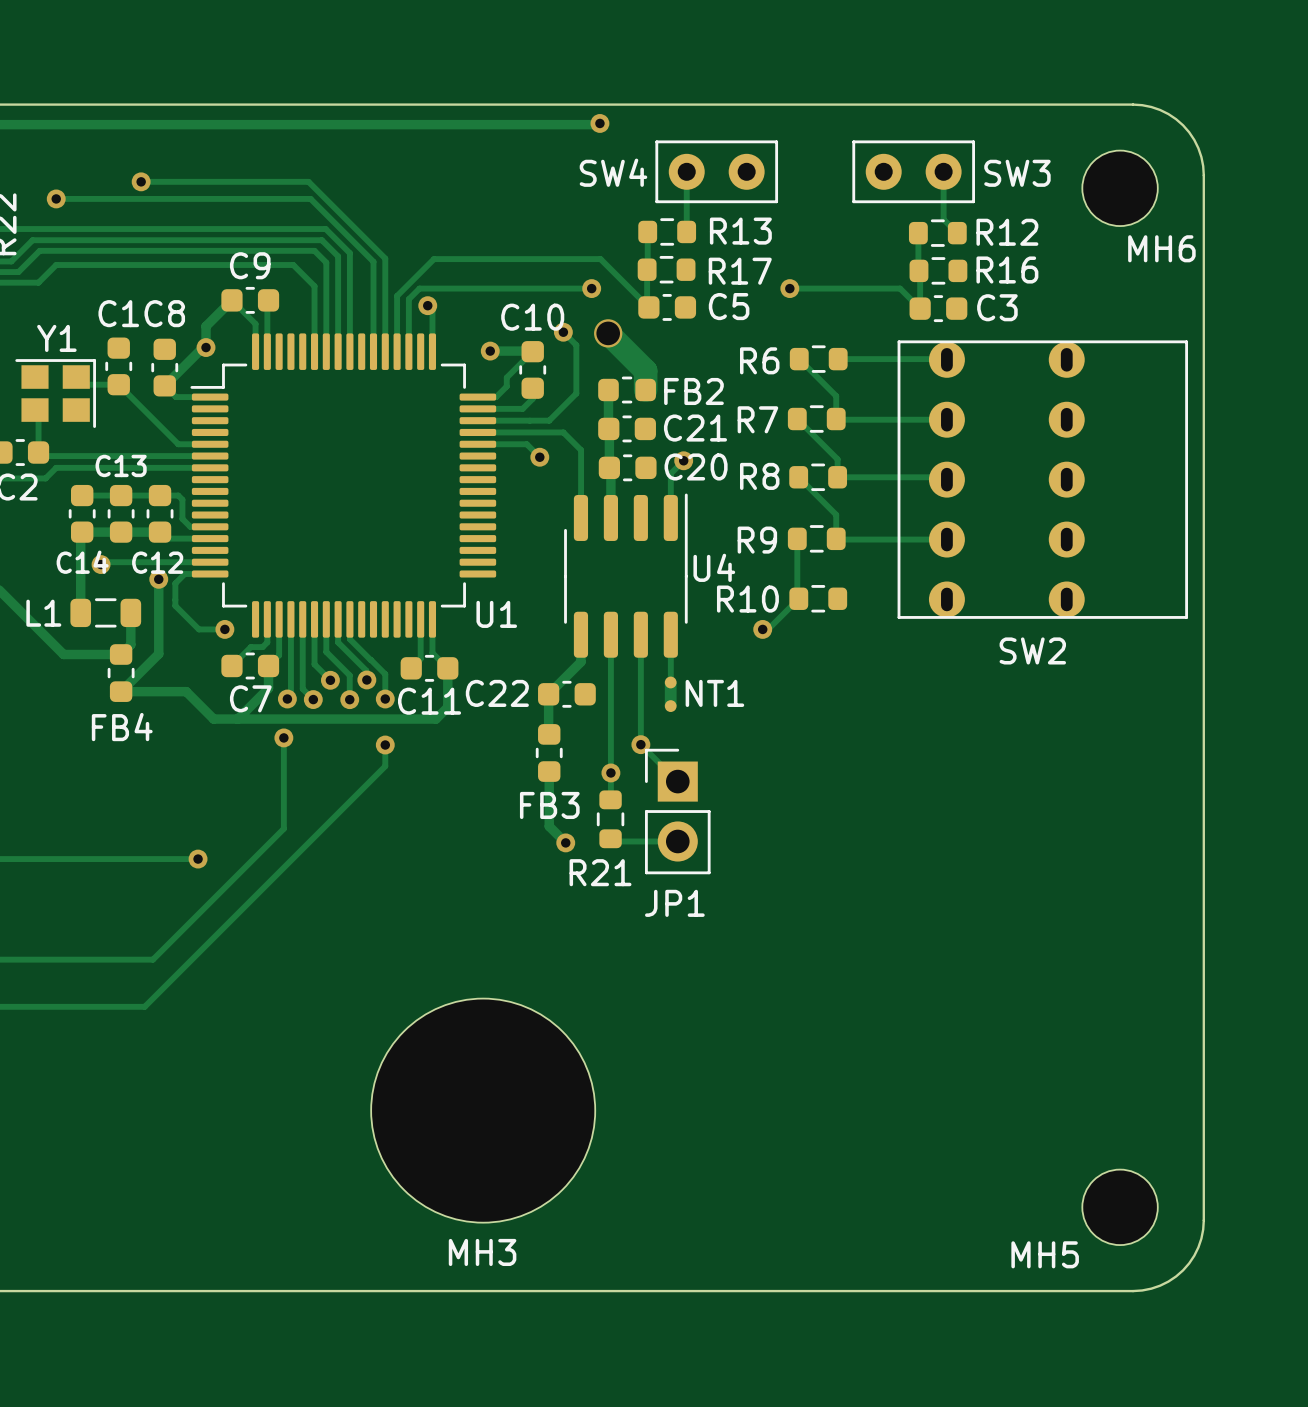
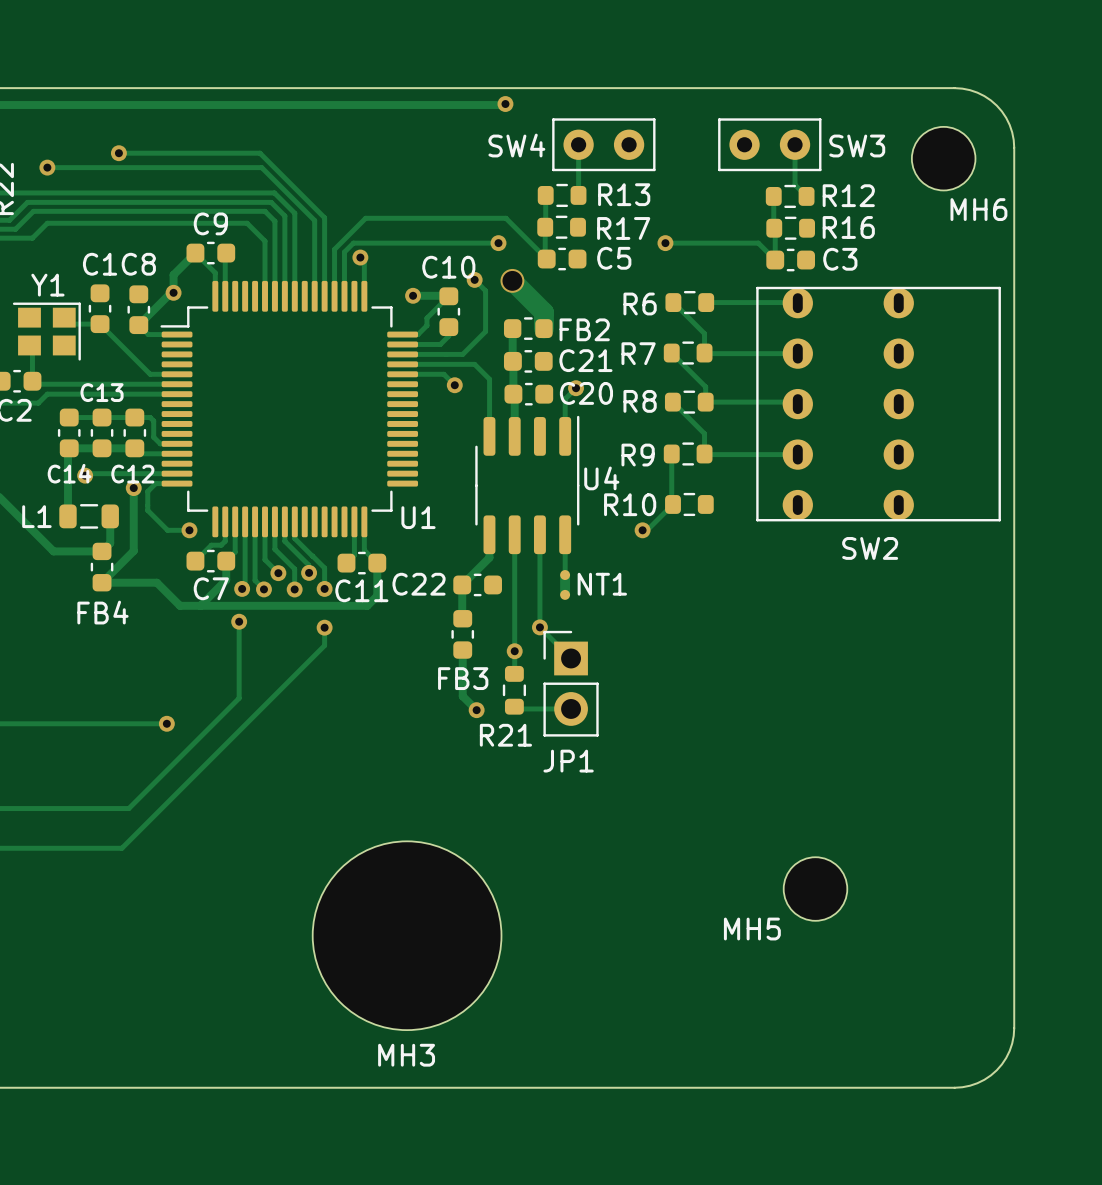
MH5 position: (1120, 1207) -> (815, 889)

